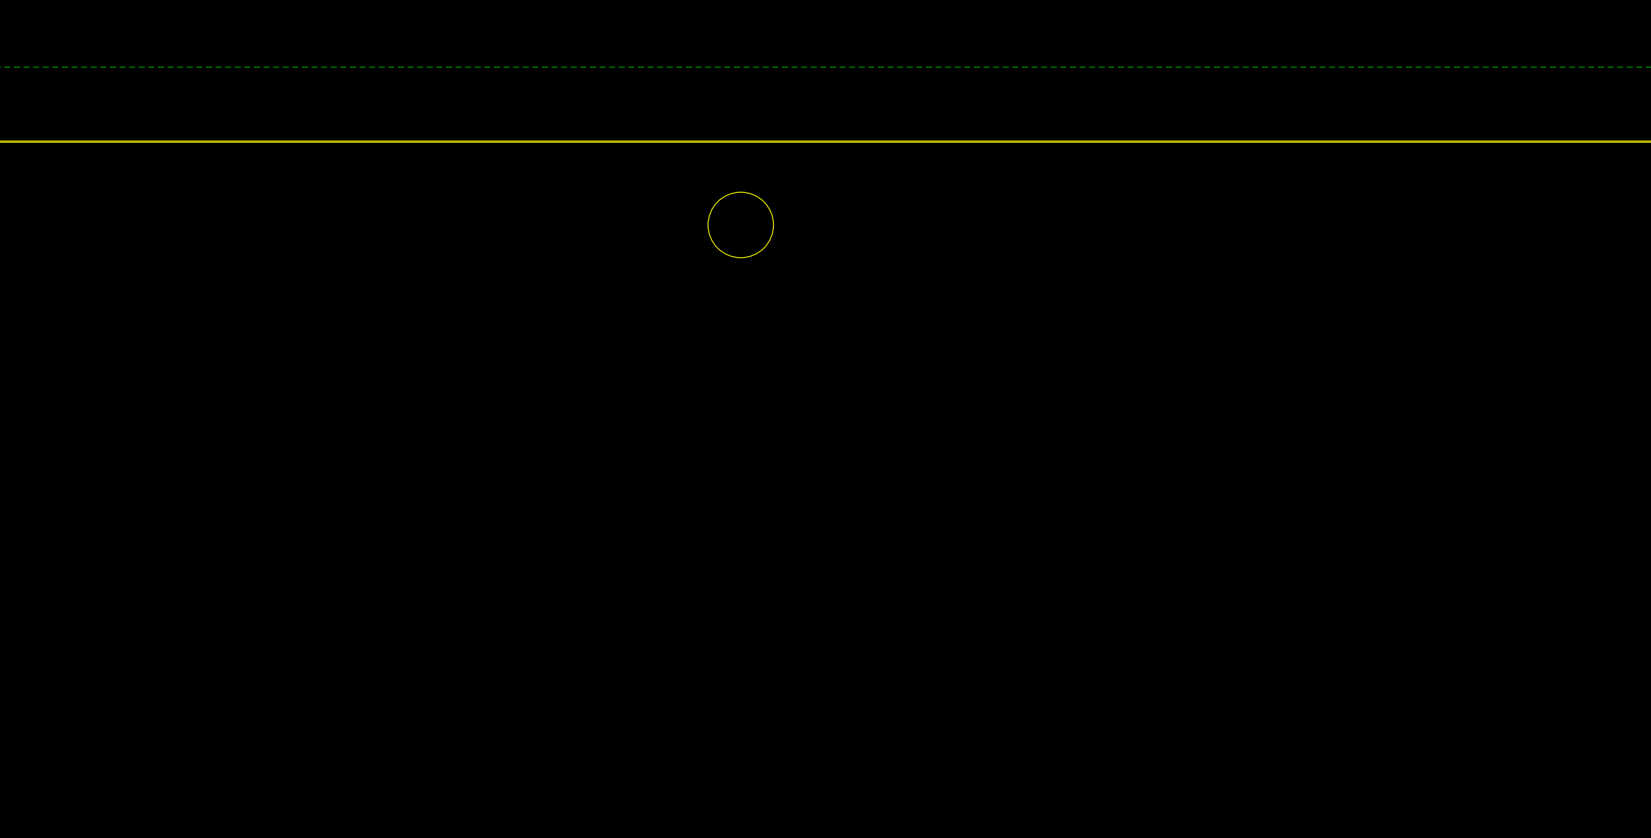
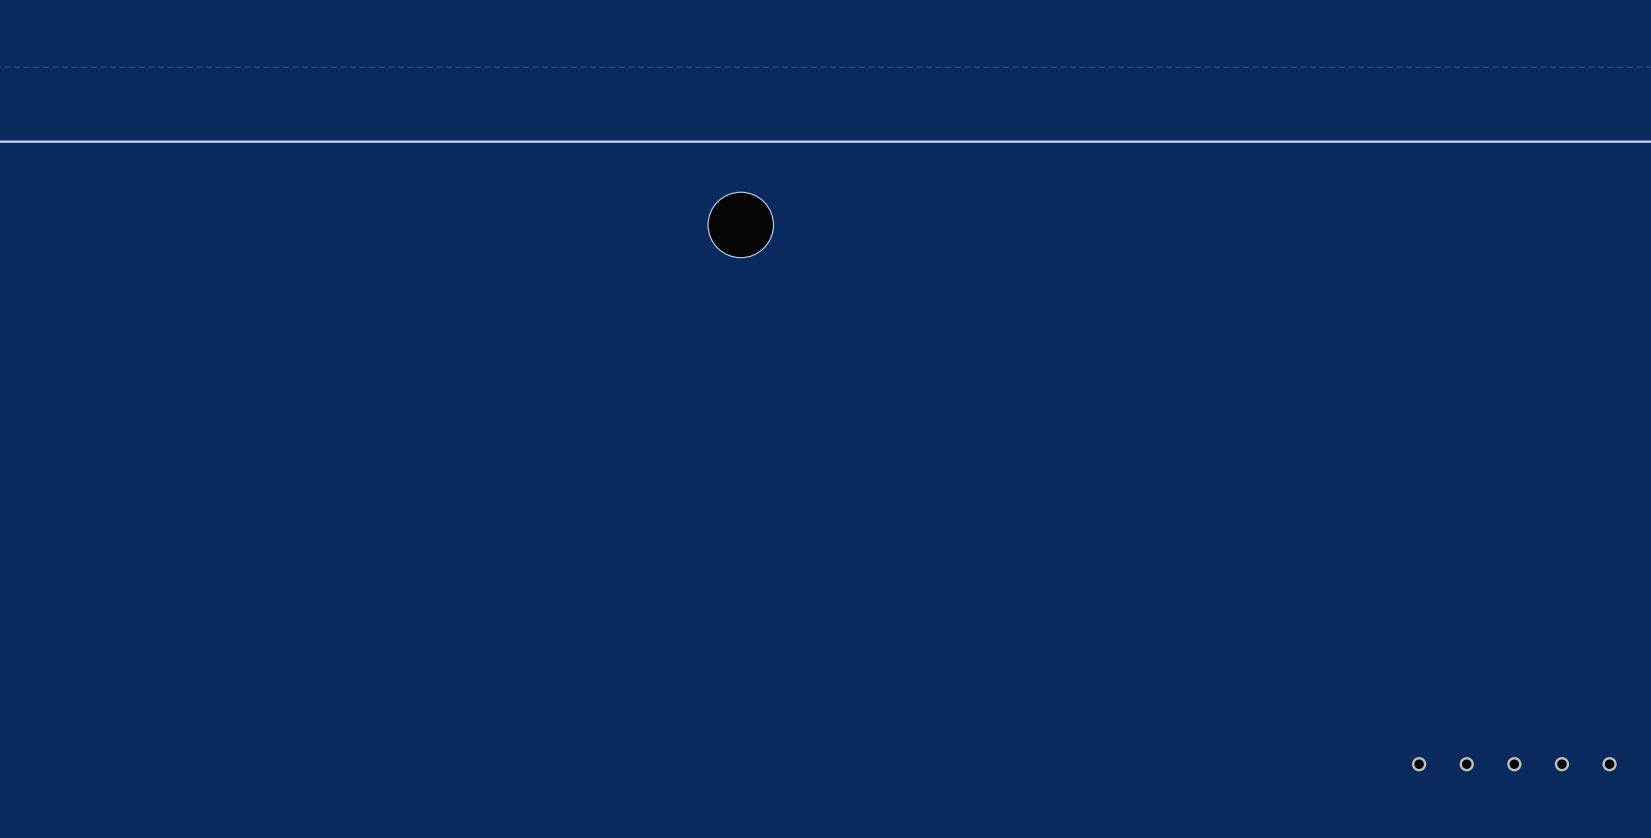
via: none -> (1419, 764)
via: none -> (1466, 764)
via: none -> (1514, 764)
via: none -> (1561, 764)
via: none -> (1609, 764)

